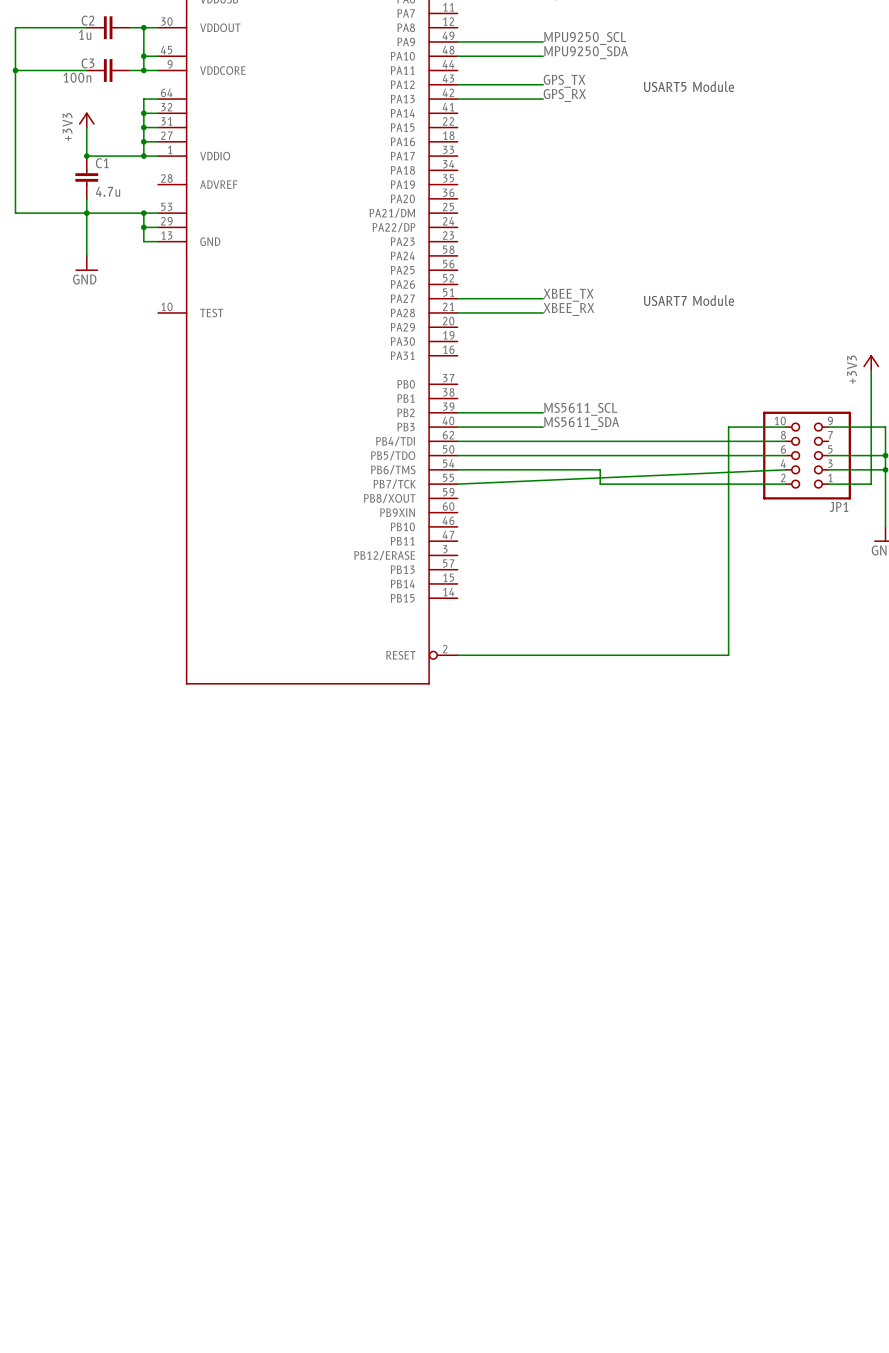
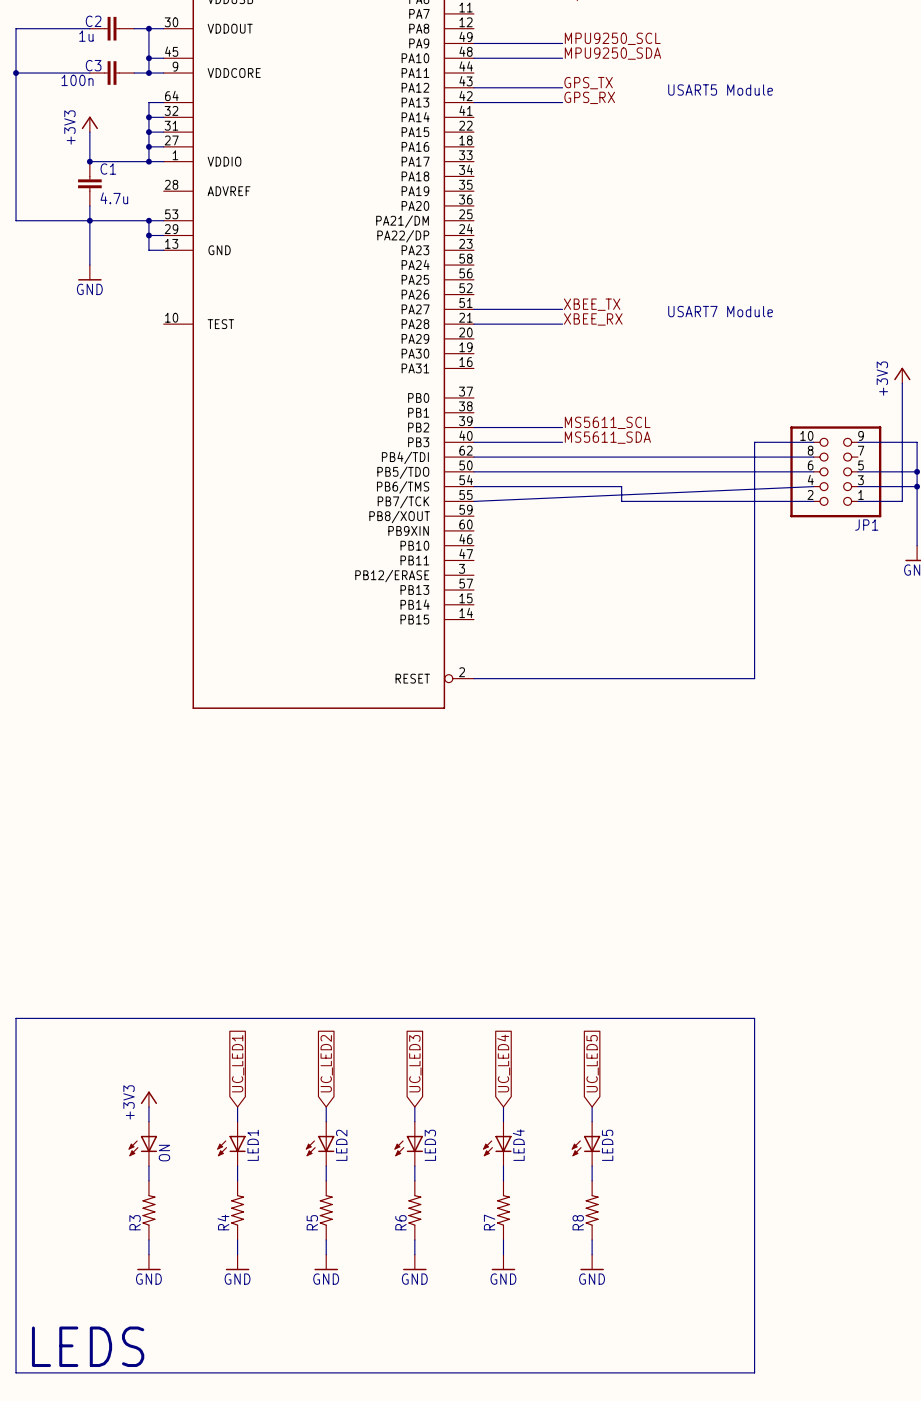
wire: none -> (16, 1018) (754, 1018) (754, 1372) (16, 1372) (16, 1018)
global label: none -> UC_LED1 (238, 1063)
global label: none -> UC_LED2 (326, 1063)
global label: none -> UC_LED3 (415, 1063)
global label: none -> UC_LED4 (503, 1063)
global label: none -> UC_LED5 (592, 1063)
power symbol: none -> +3V3 (148, 1099)
wire: none -> (148, 1107) (148, 1121)
wire: none -> (237, 1107) (237, 1121)
wire: none -> (326, 1107) (326, 1121)
wire: none -> (414, 1107) (414, 1121)
wire: none -> (503, 1107) (503, 1121)
wire: none -> (592, 1107) (592, 1121)
ON: none -> (142, 1143)
LED1: none -> (231, 1143)
LED2: none -> (320, 1143)
LED3: none -> (408, 1143)
LED4: none -> (497, 1143)
LED5: none -> (585, 1143)
wire: none -> (148, 1166) (148, 1180)
wire: none -> (237, 1166) (237, 1180)
wire: none -> (326, 1166) (326, 1180)
wire: none -> (414, 1166) (414, 1180)
wire: none -> (503, 1166) (503, 1180)
wire: none -> (592, 1166) (592, 1180)
R3: none -> (148, 1210)
R4: none -> (237, 1210)
R5: none -> (326, 1210)
R6: none -> (414, 1210)
R7: none -> (503, 1210)
R8: none -> (592, 1210)
wire: none -> (148, 1239) (148, 1254)
wire: none -> (237, 1239) (237, 1254)
wire: none -> (326, 1239) (326, 1254)
wire: none -> (414, 1239) (414, 1254)
wire: none -> (503, 1239) (503, 1254)
wire: none -> (592, 1239) (592, 1254)
power symbol: none -> GND (148, 1262)
power symbol: none -> GND (237, 1262)
power symbol: none -> GND (326, 1262)
power symbol: none -> GND (414, 1262)
power symbol: none -> GND (503, 1262)
power symbol: none -> GND (592, 1262)
text: none -> LEDS (88, 1346)

